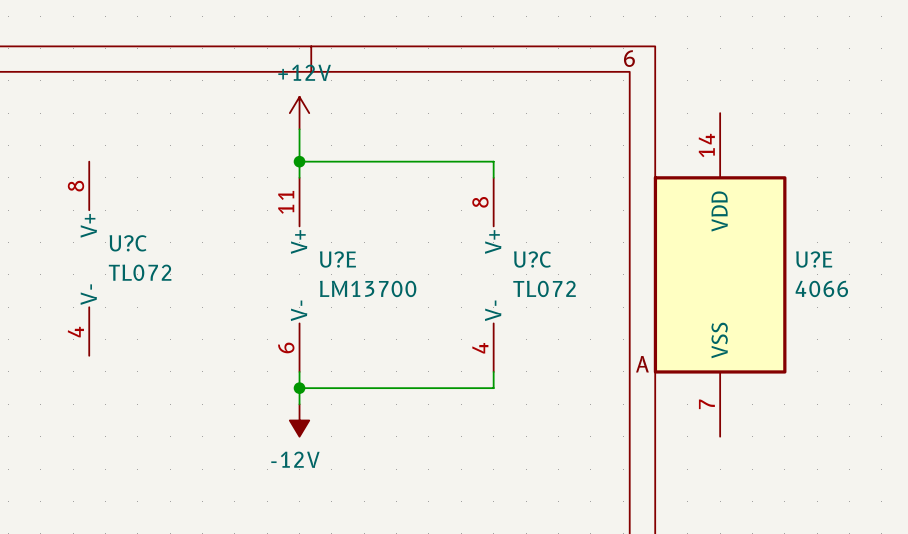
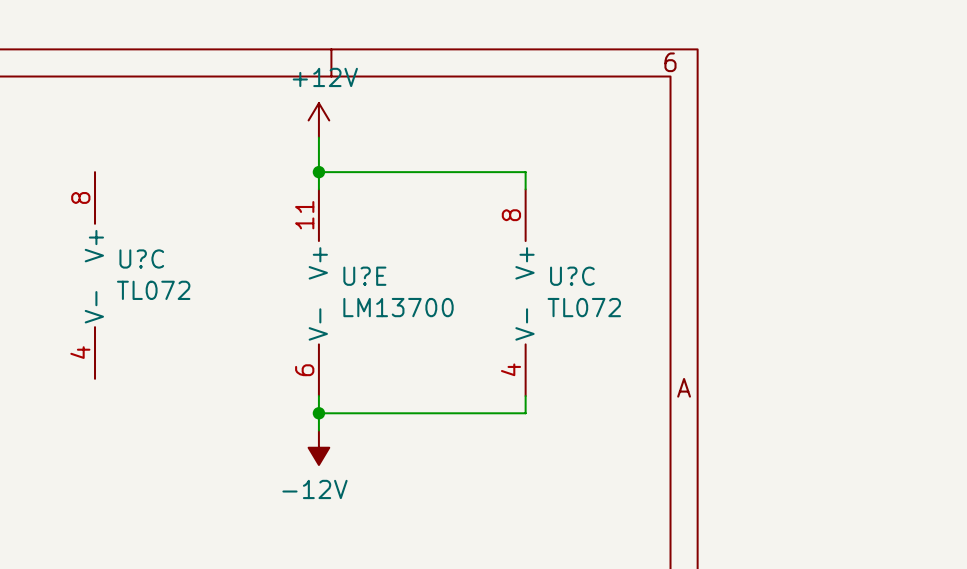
U?E: 4066 (720, 274) -> none

